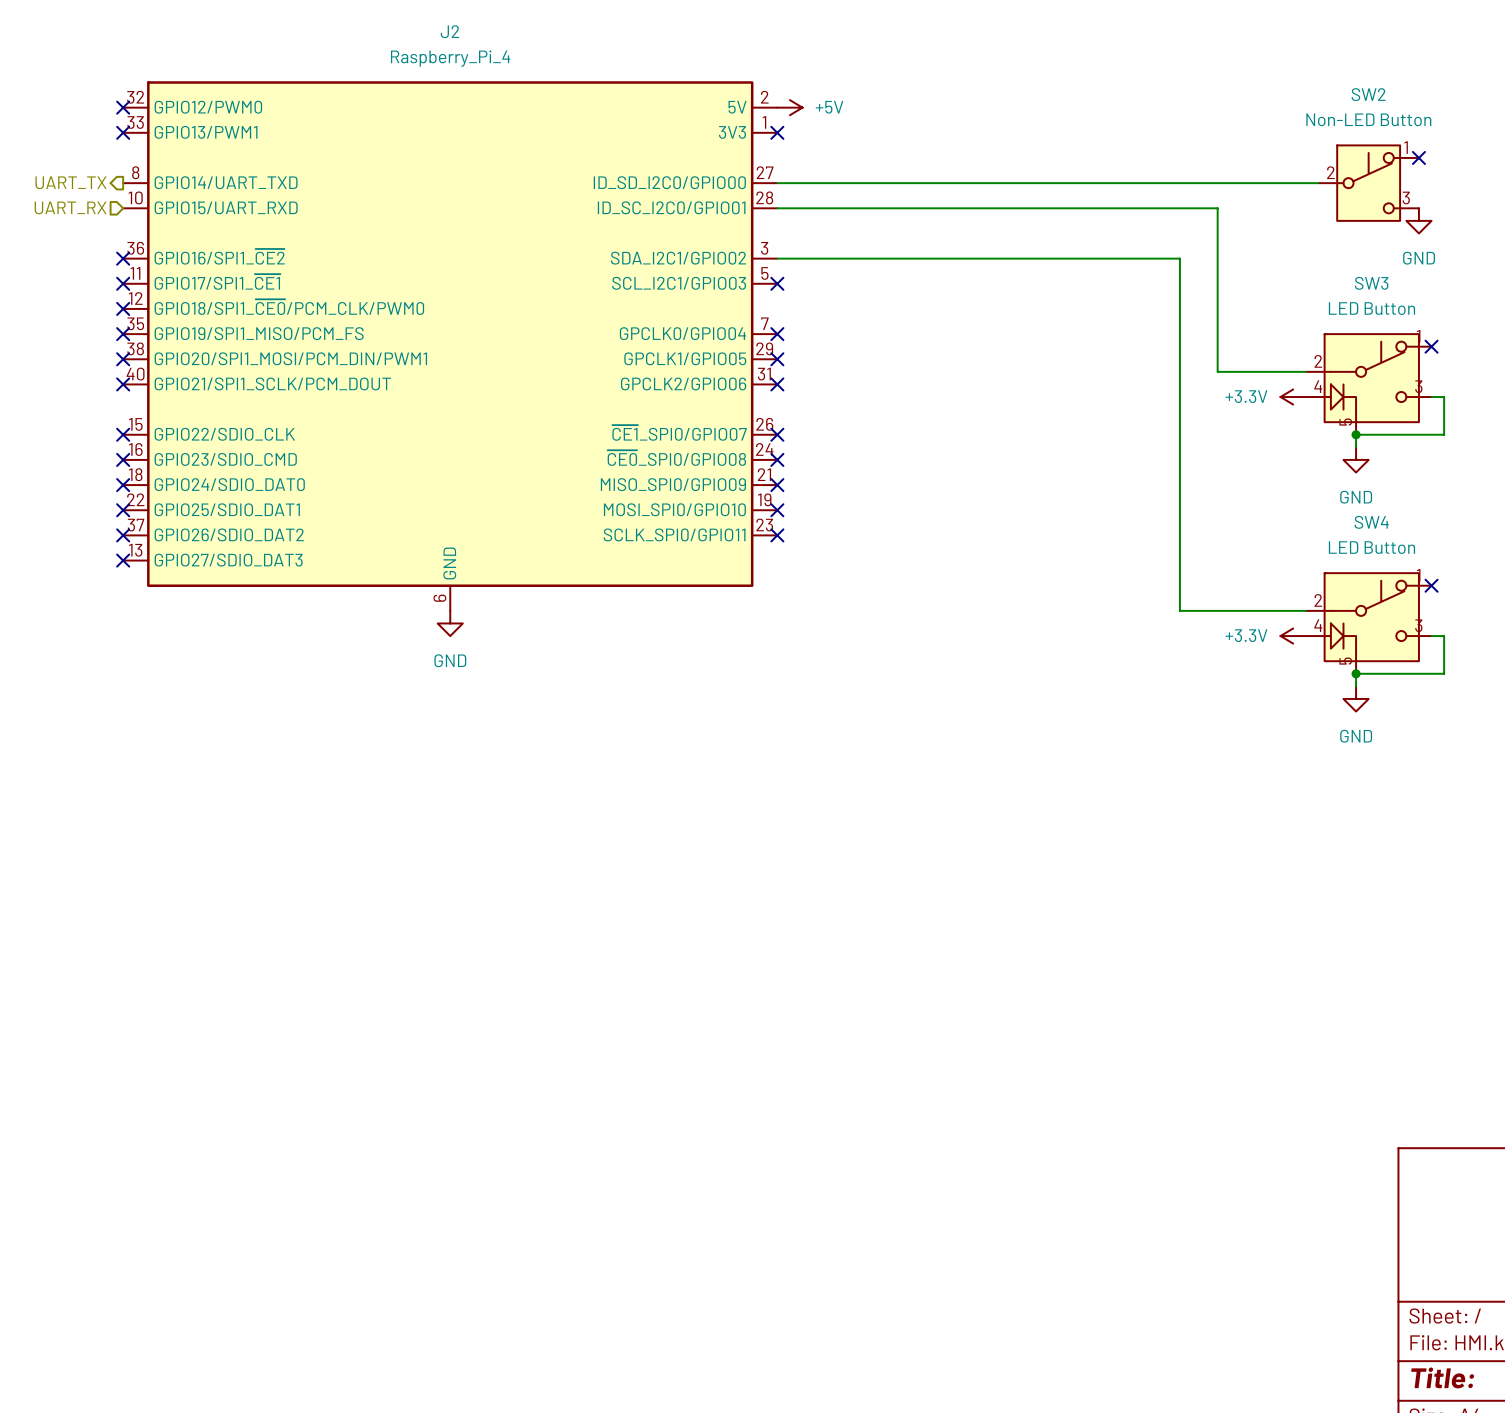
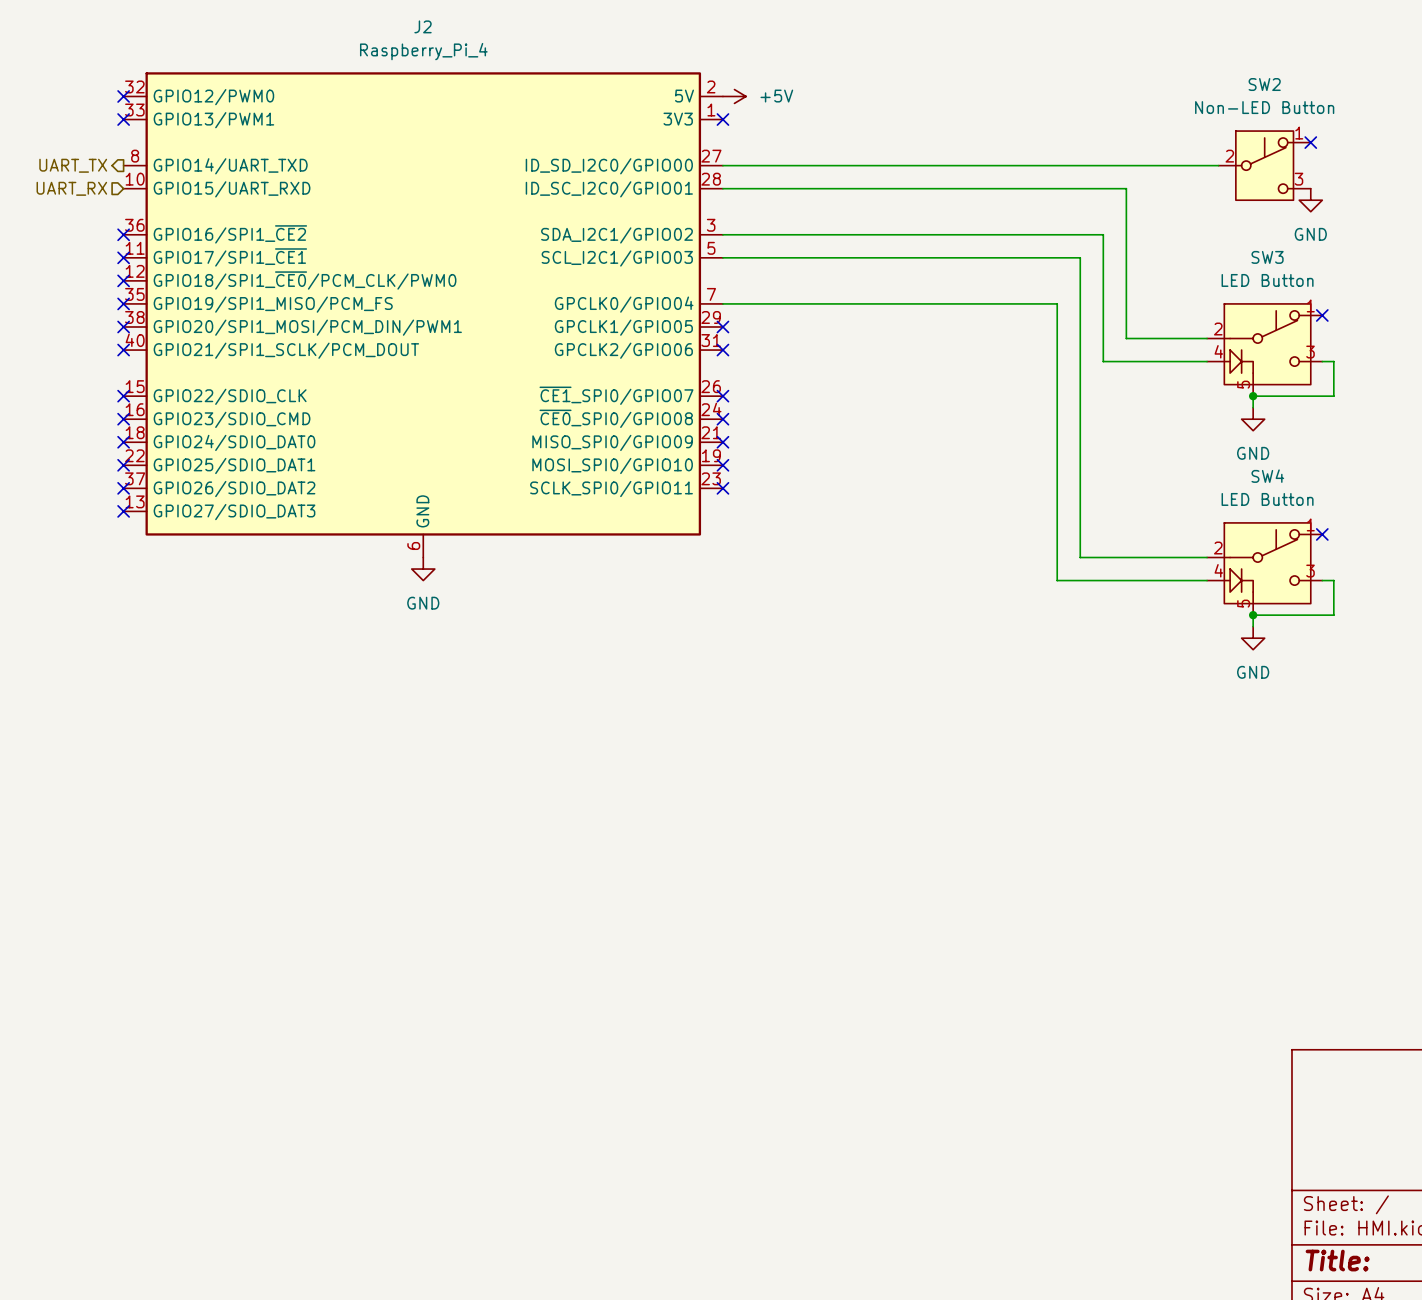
wire: (1179, 258) (1179, 610) -> (1091, 234) (1103, 234) (1103, 361) (1207, 361)
wire: none -> (722, 257) (1080, 257) (1080, 557) (1091, 557)
no-connect mark: (777, 283) -> none
wire: none -> (722, 303) (1057, 303) (1057, 580) (1207, 580)
no-connect mark: (777, 334) -> none
power symbol: +3.3V (1293, 397) -> none
power symbol: +3.3V (1293, 636) -> none

